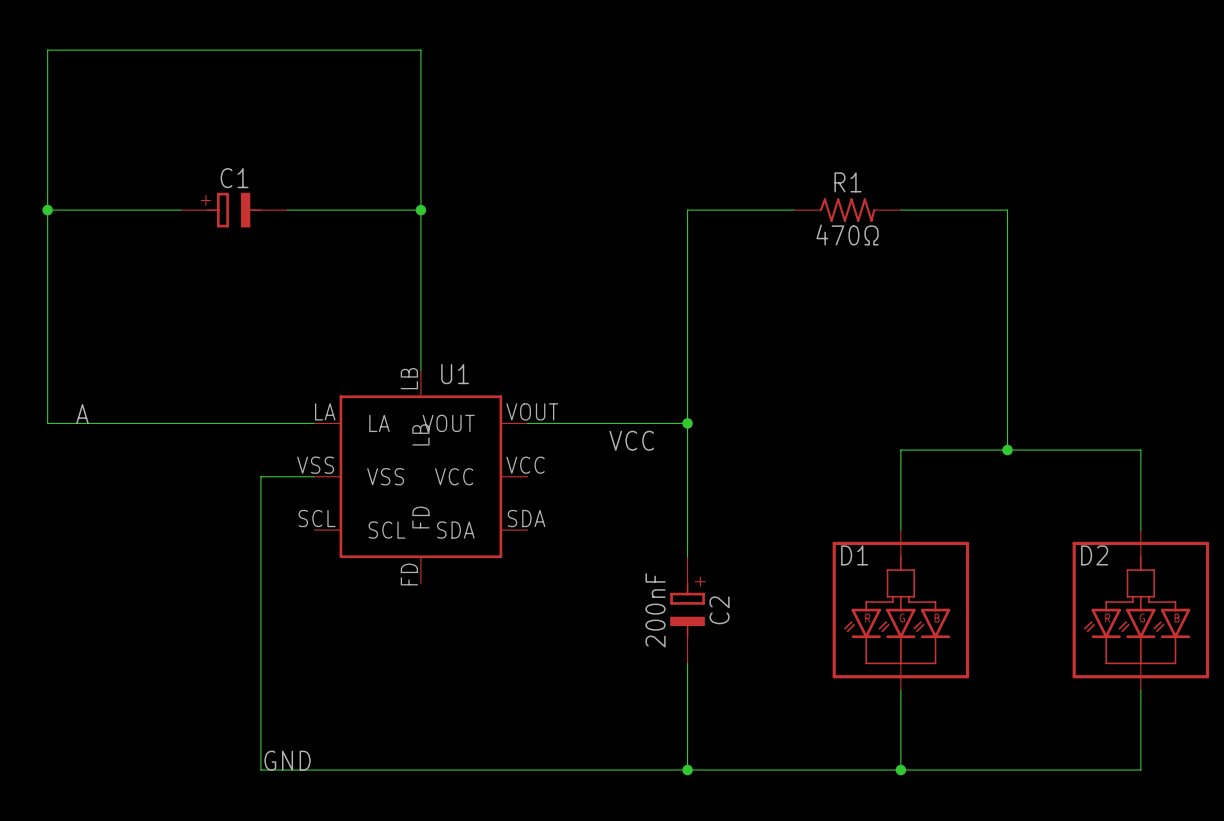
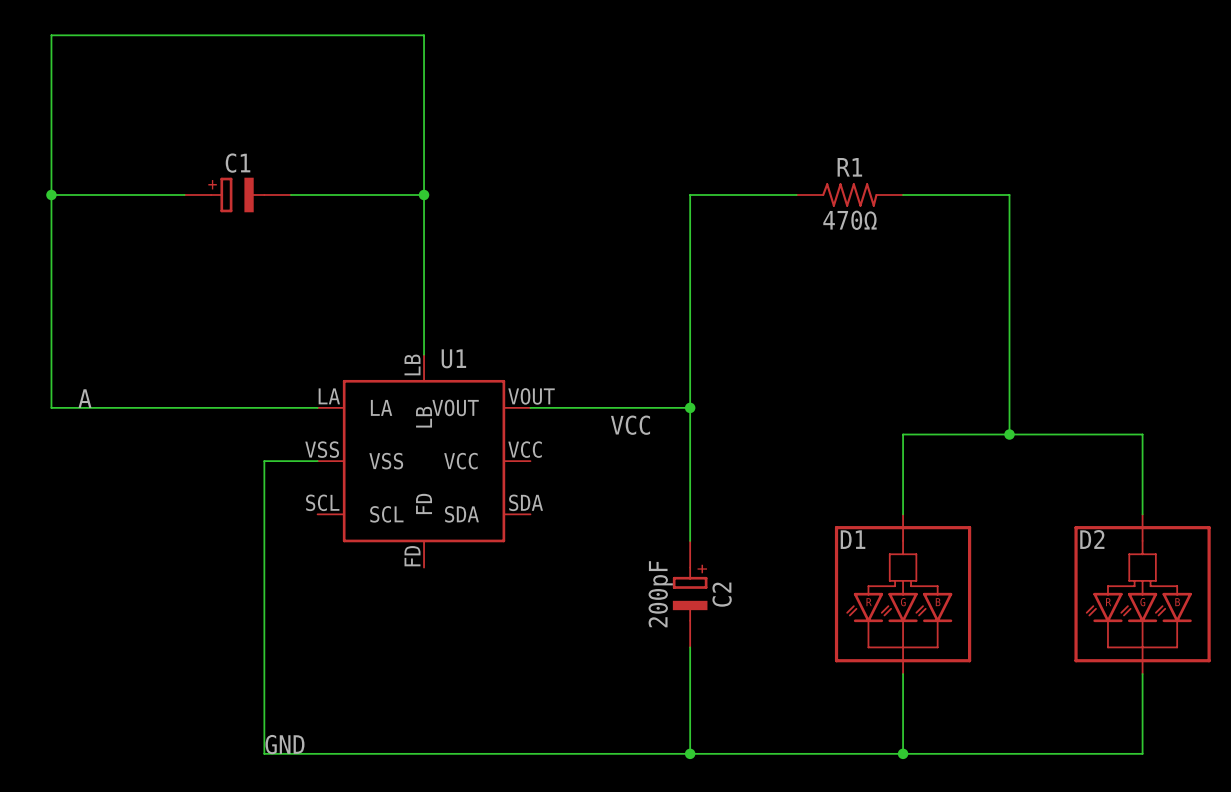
C2 value: 200nF (655, 610) -> 200pF (660, 594)

